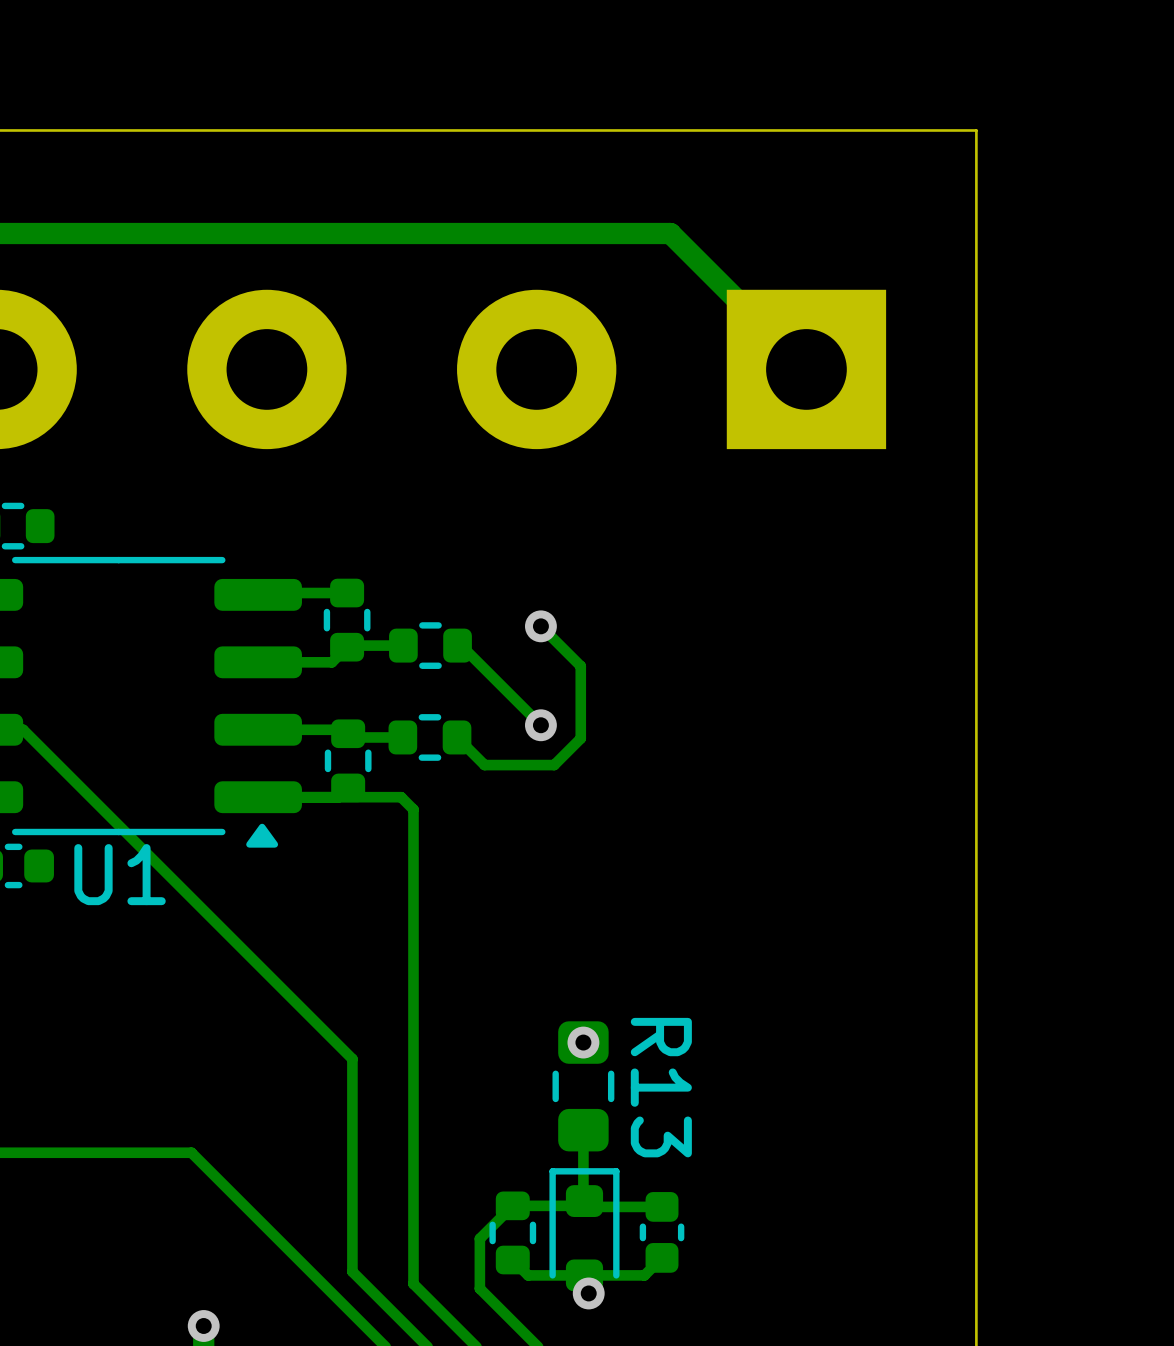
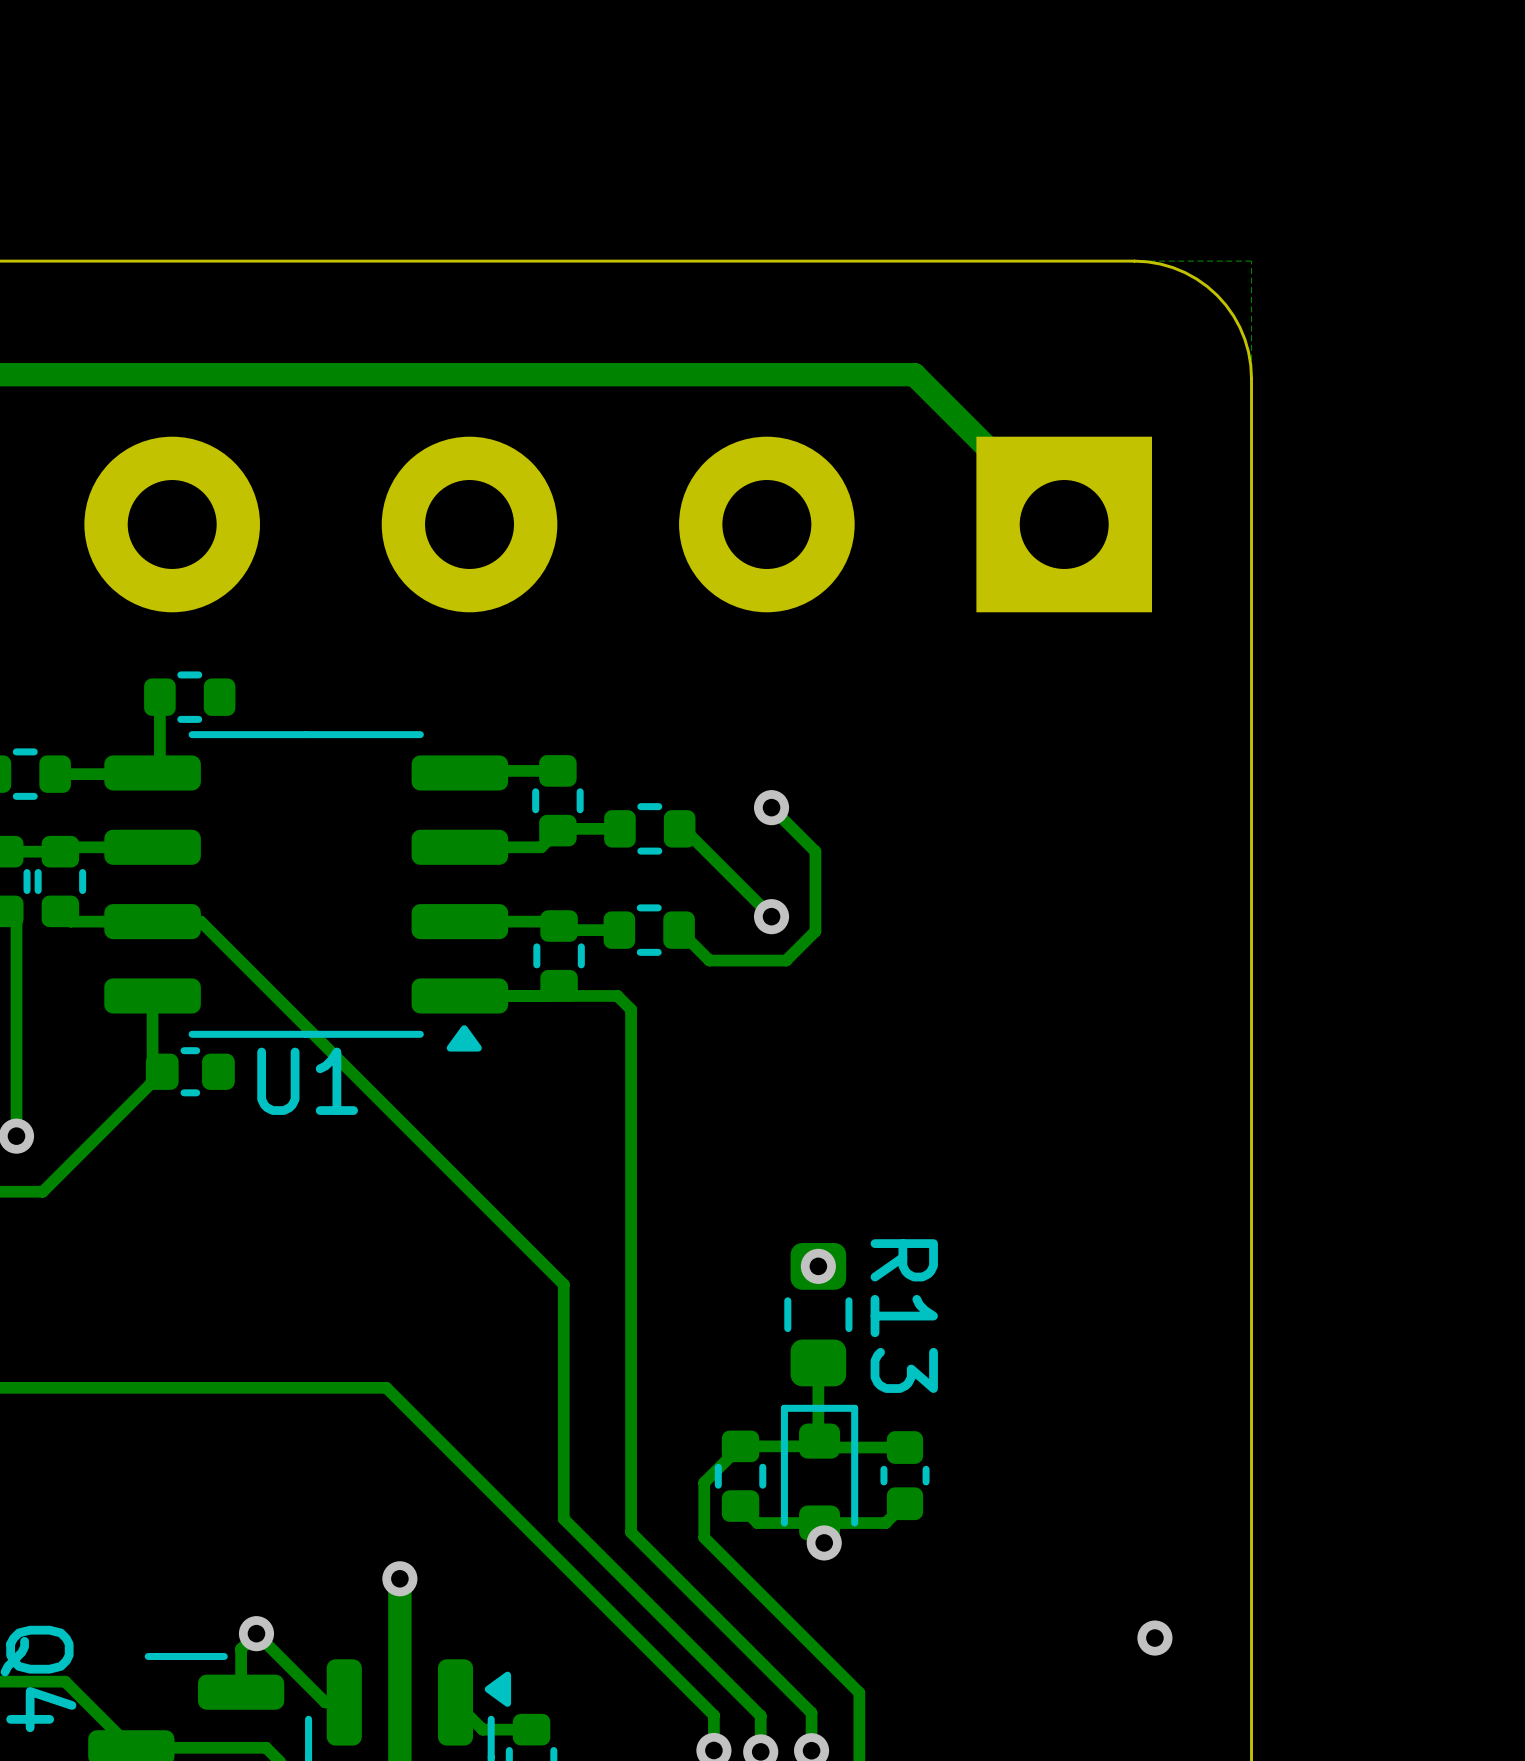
board edge: (870, 130) (976, 130) (976, 236) -> (1134, 261) (1160, 264) (1185, 272) (1217, 295) (1233, 315) (1244, 339) (1251, 378)

